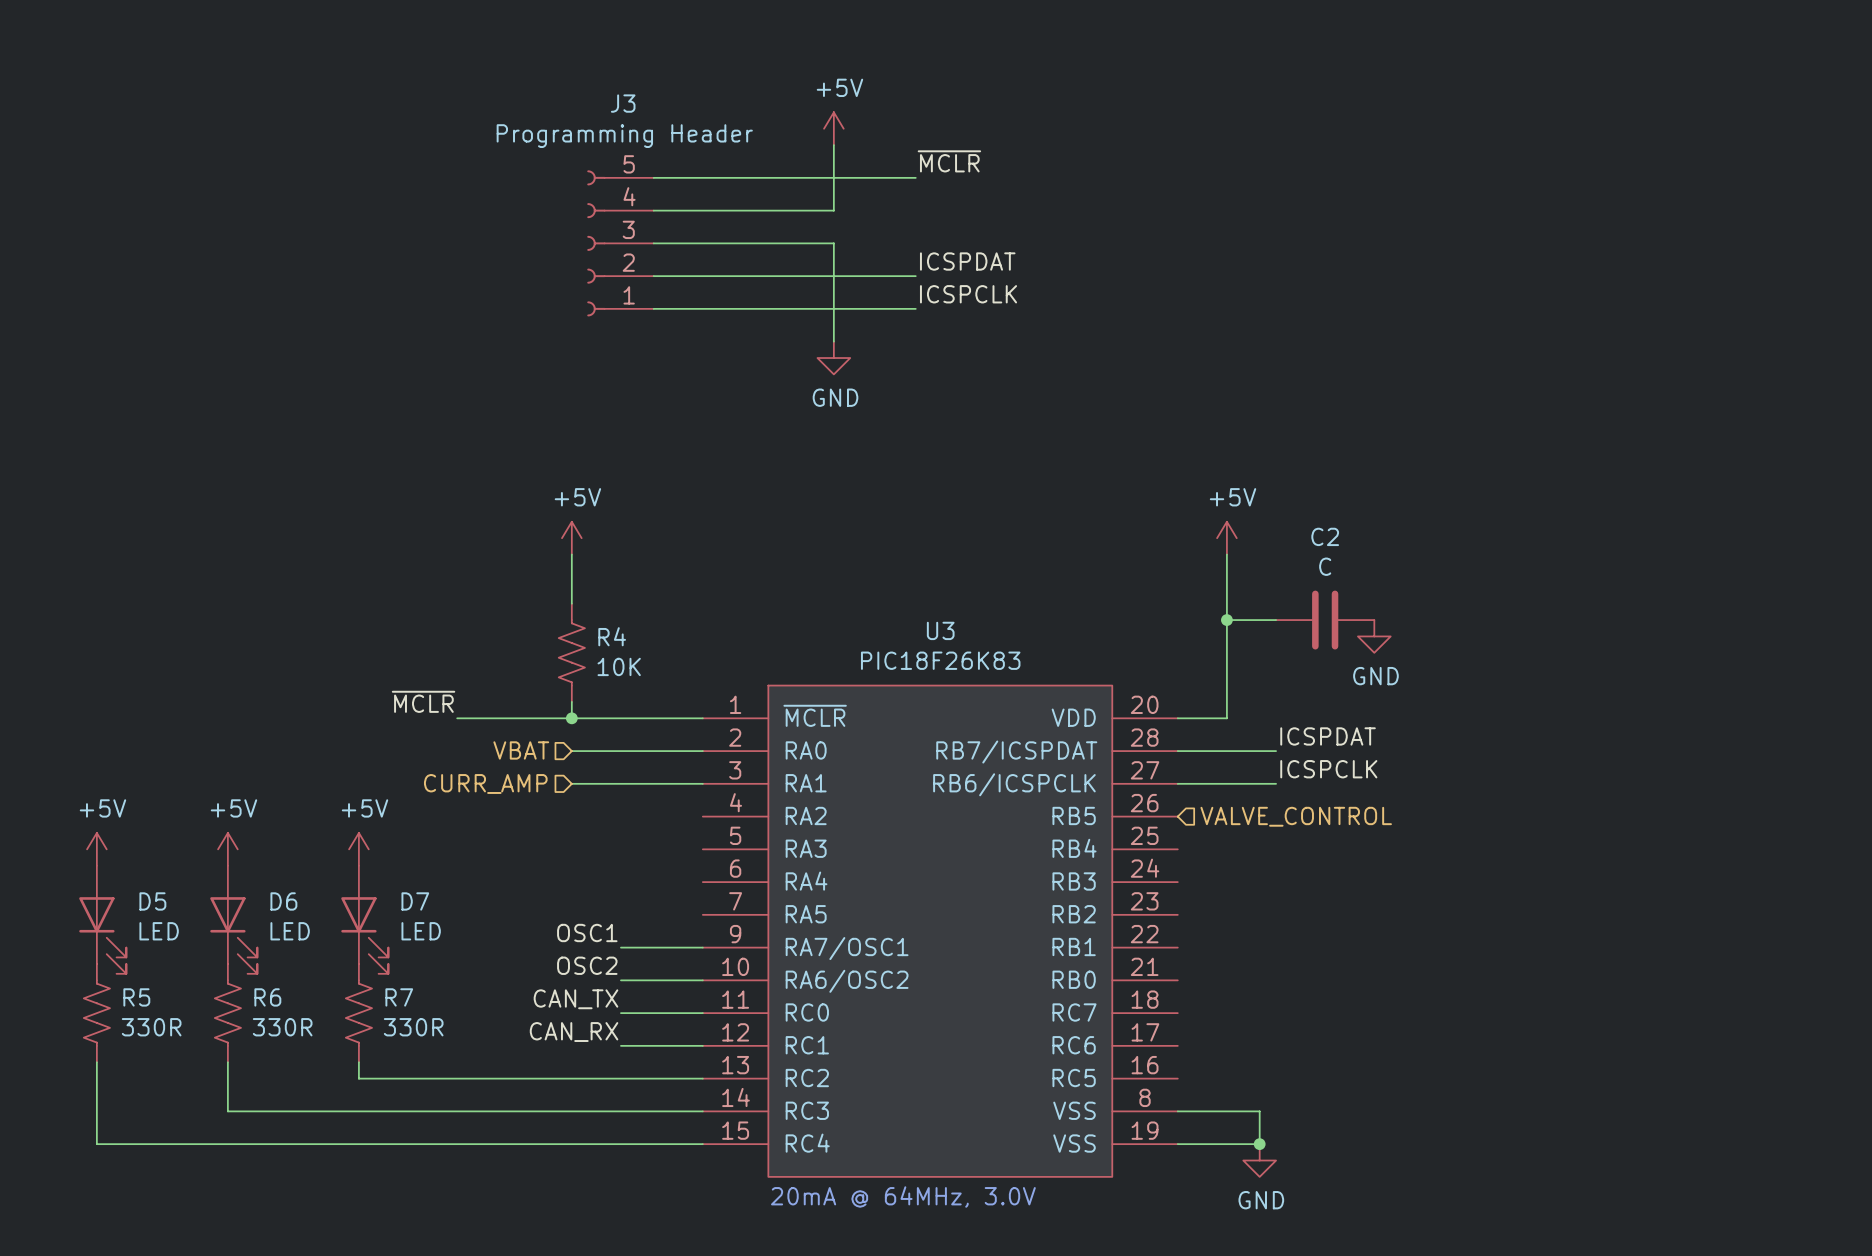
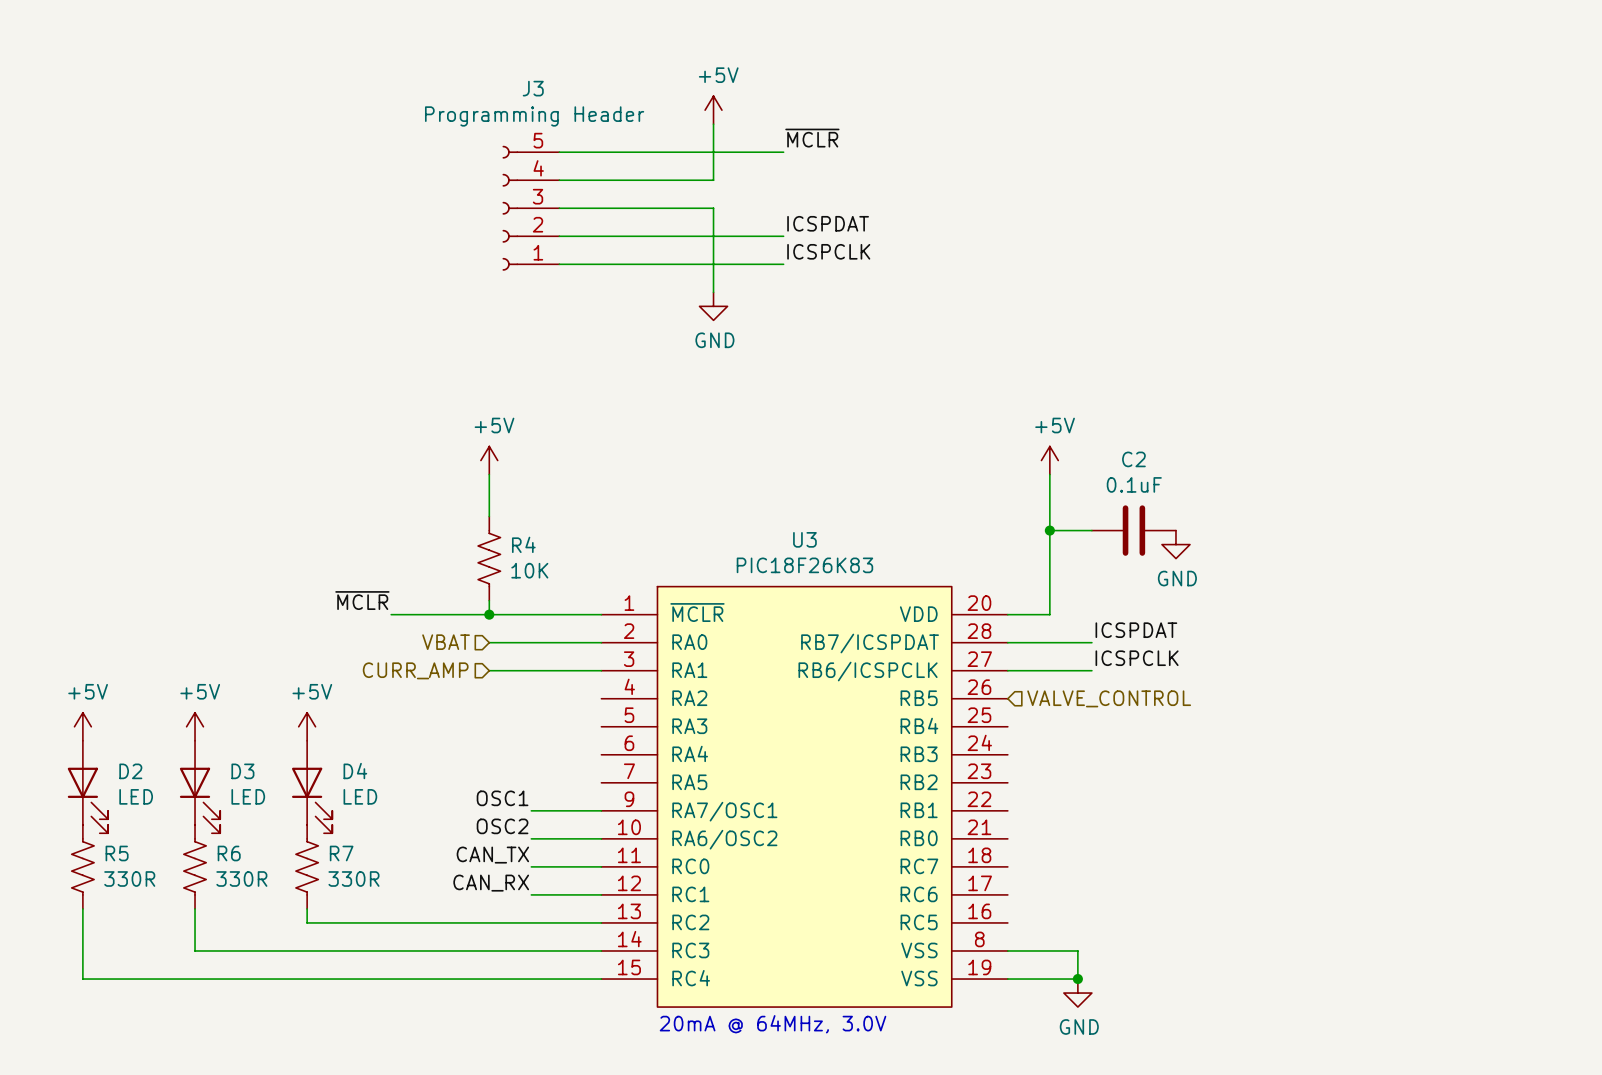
C2 value: C (1325, 566) -> 0.1uF (1134, 484)
D5 name: D5 (152, 901) -> D2 (130, 771)
D6 name: D6 (283, 901) -> D3 (242, 771)
D7 name: D7 (415, 901) -> D4 (355, 771)

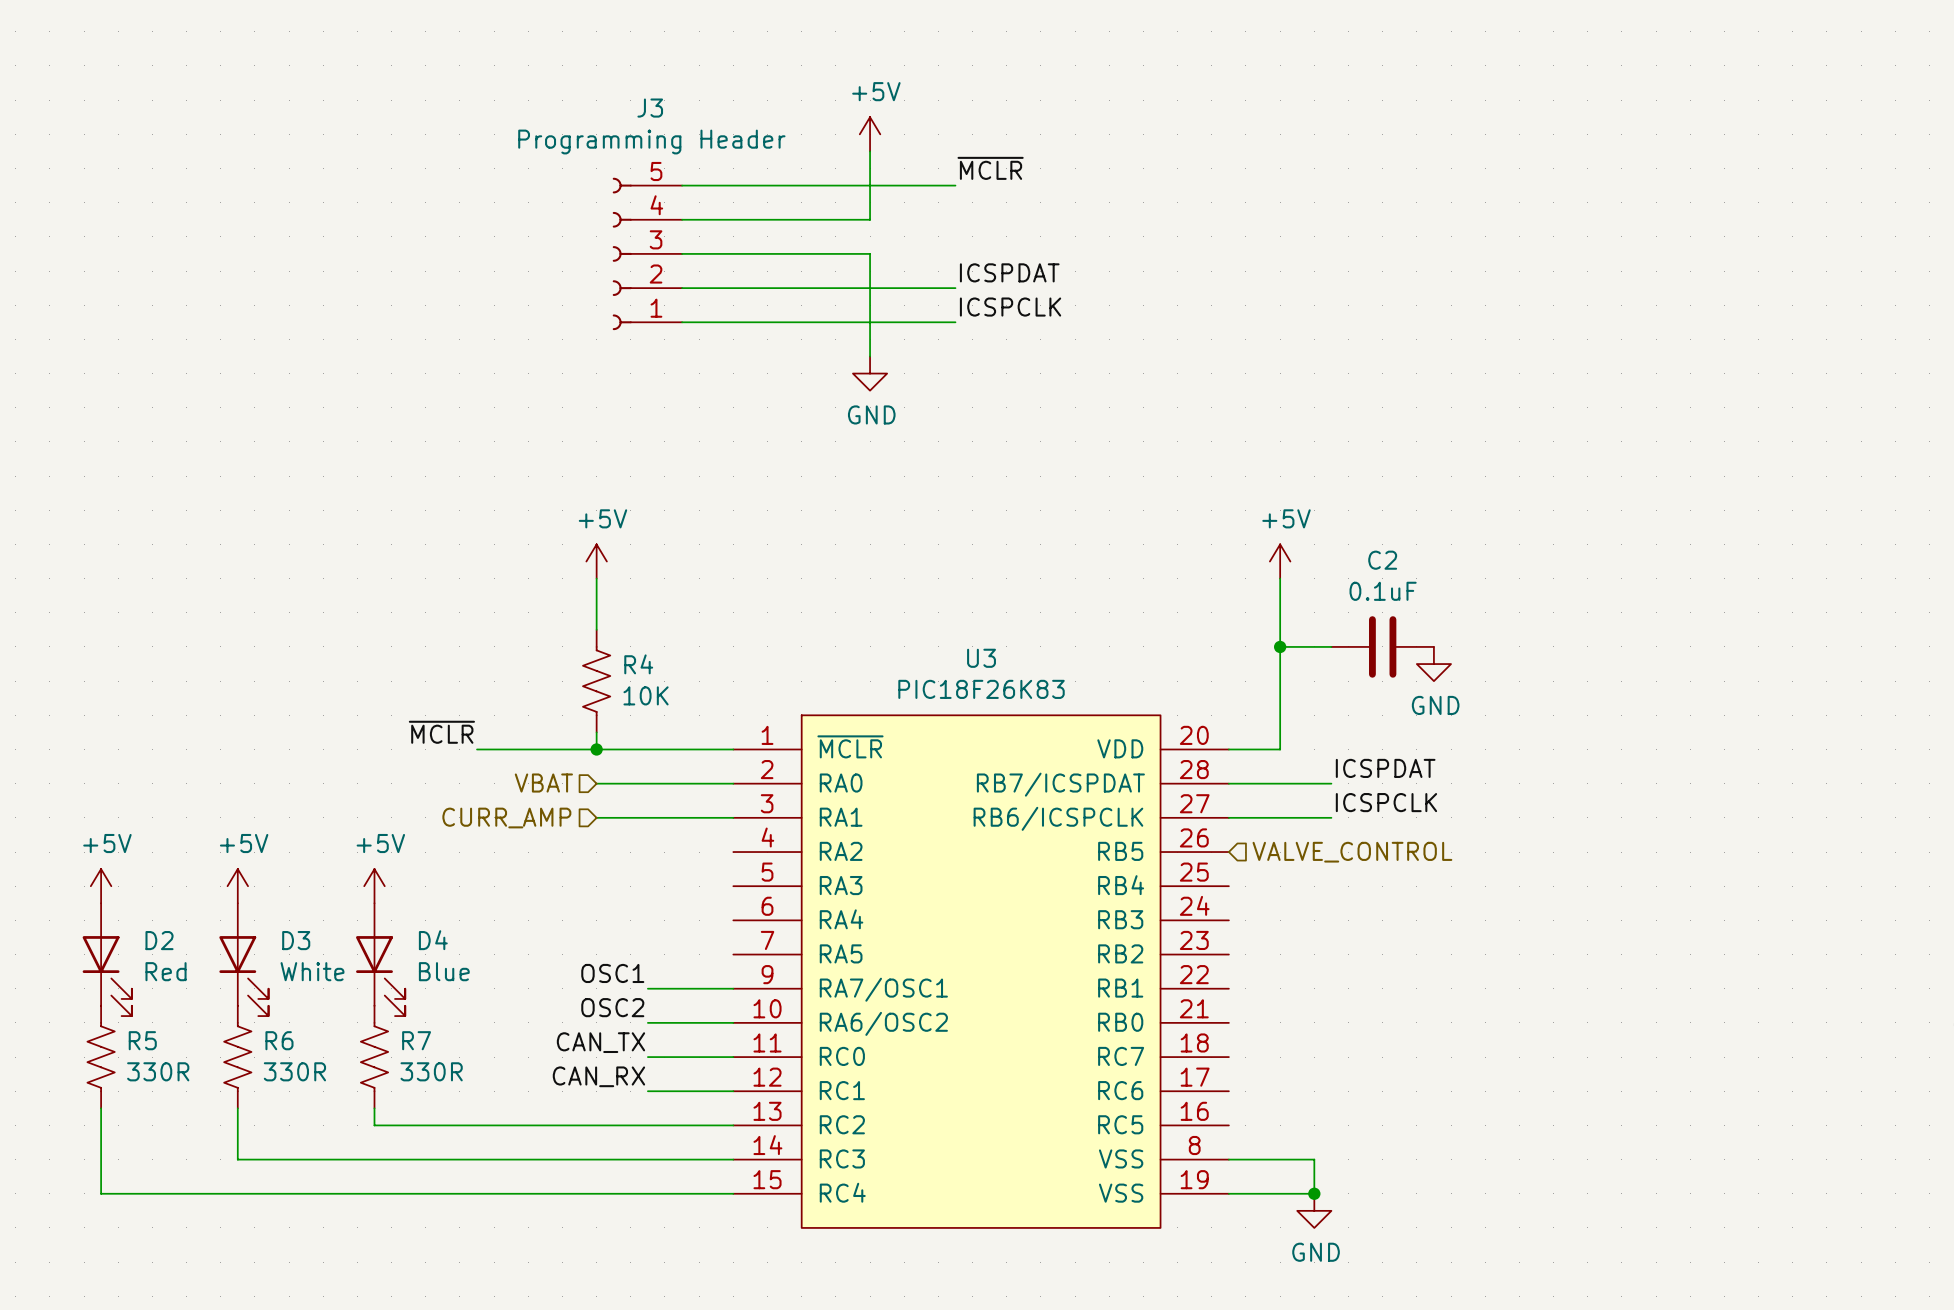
D2 value: LED (136, 796) -> Red (166, 971)
D3 value: LED (248, 796) -> White (312, 971)
D4 value: LED (360, 796) -> Blue (444, 971)
text: 20mA @ 64MHz, 3.0V (773, 1024) -> none

